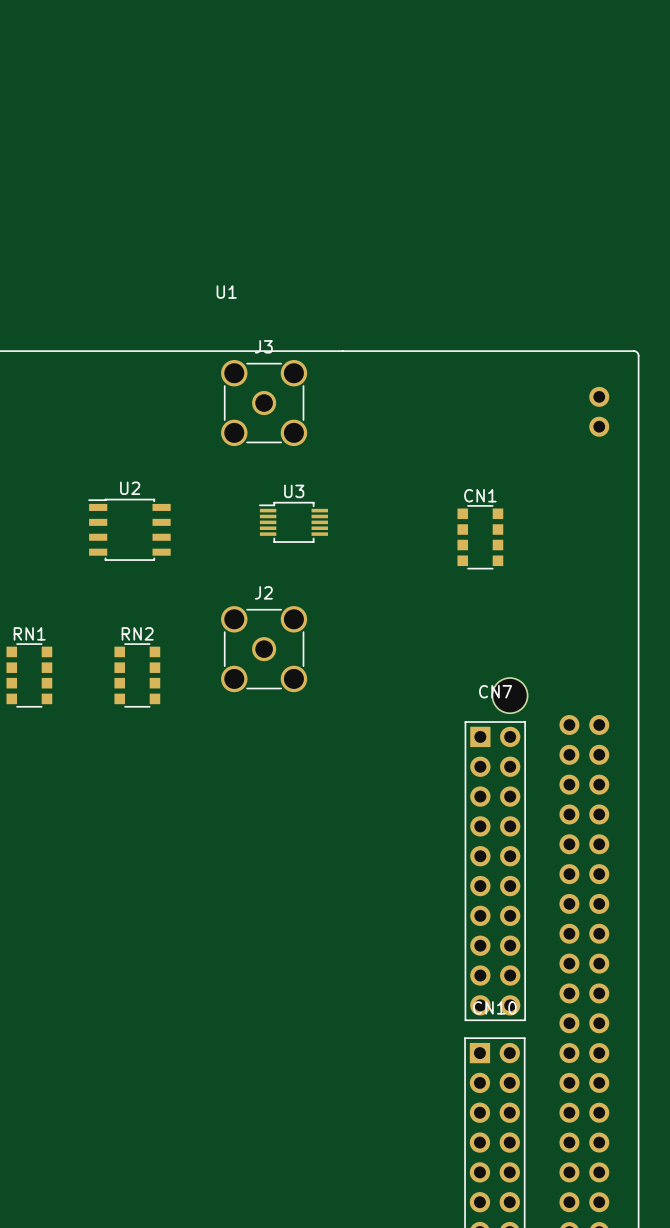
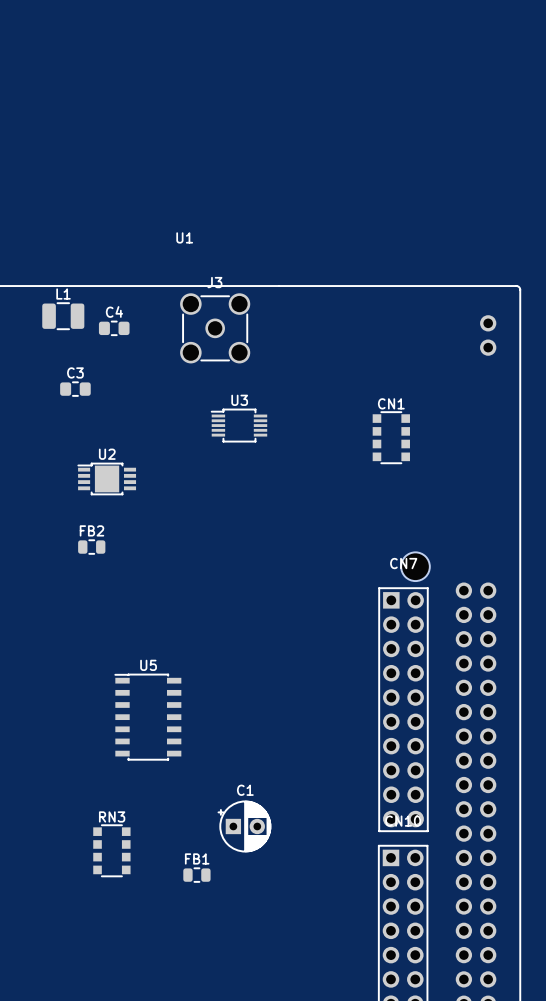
L1: none -> (63, 316)
C4: none -> (114, 328)
C3: none -> (75, 389)
U2 footprint: [88, 498, 171, 561] -> [77, 463, 137, 495]
J2: (264, 649) -> none
FB2: none -> (91, 547)
RN1: (29, 675) -> none
RN2: (137, 675) -> none
U5: none -> (147, 717)
C1: none -> (244, 826)
RN3: none -> (111, 850)
FB1: none -> (196, 875)

